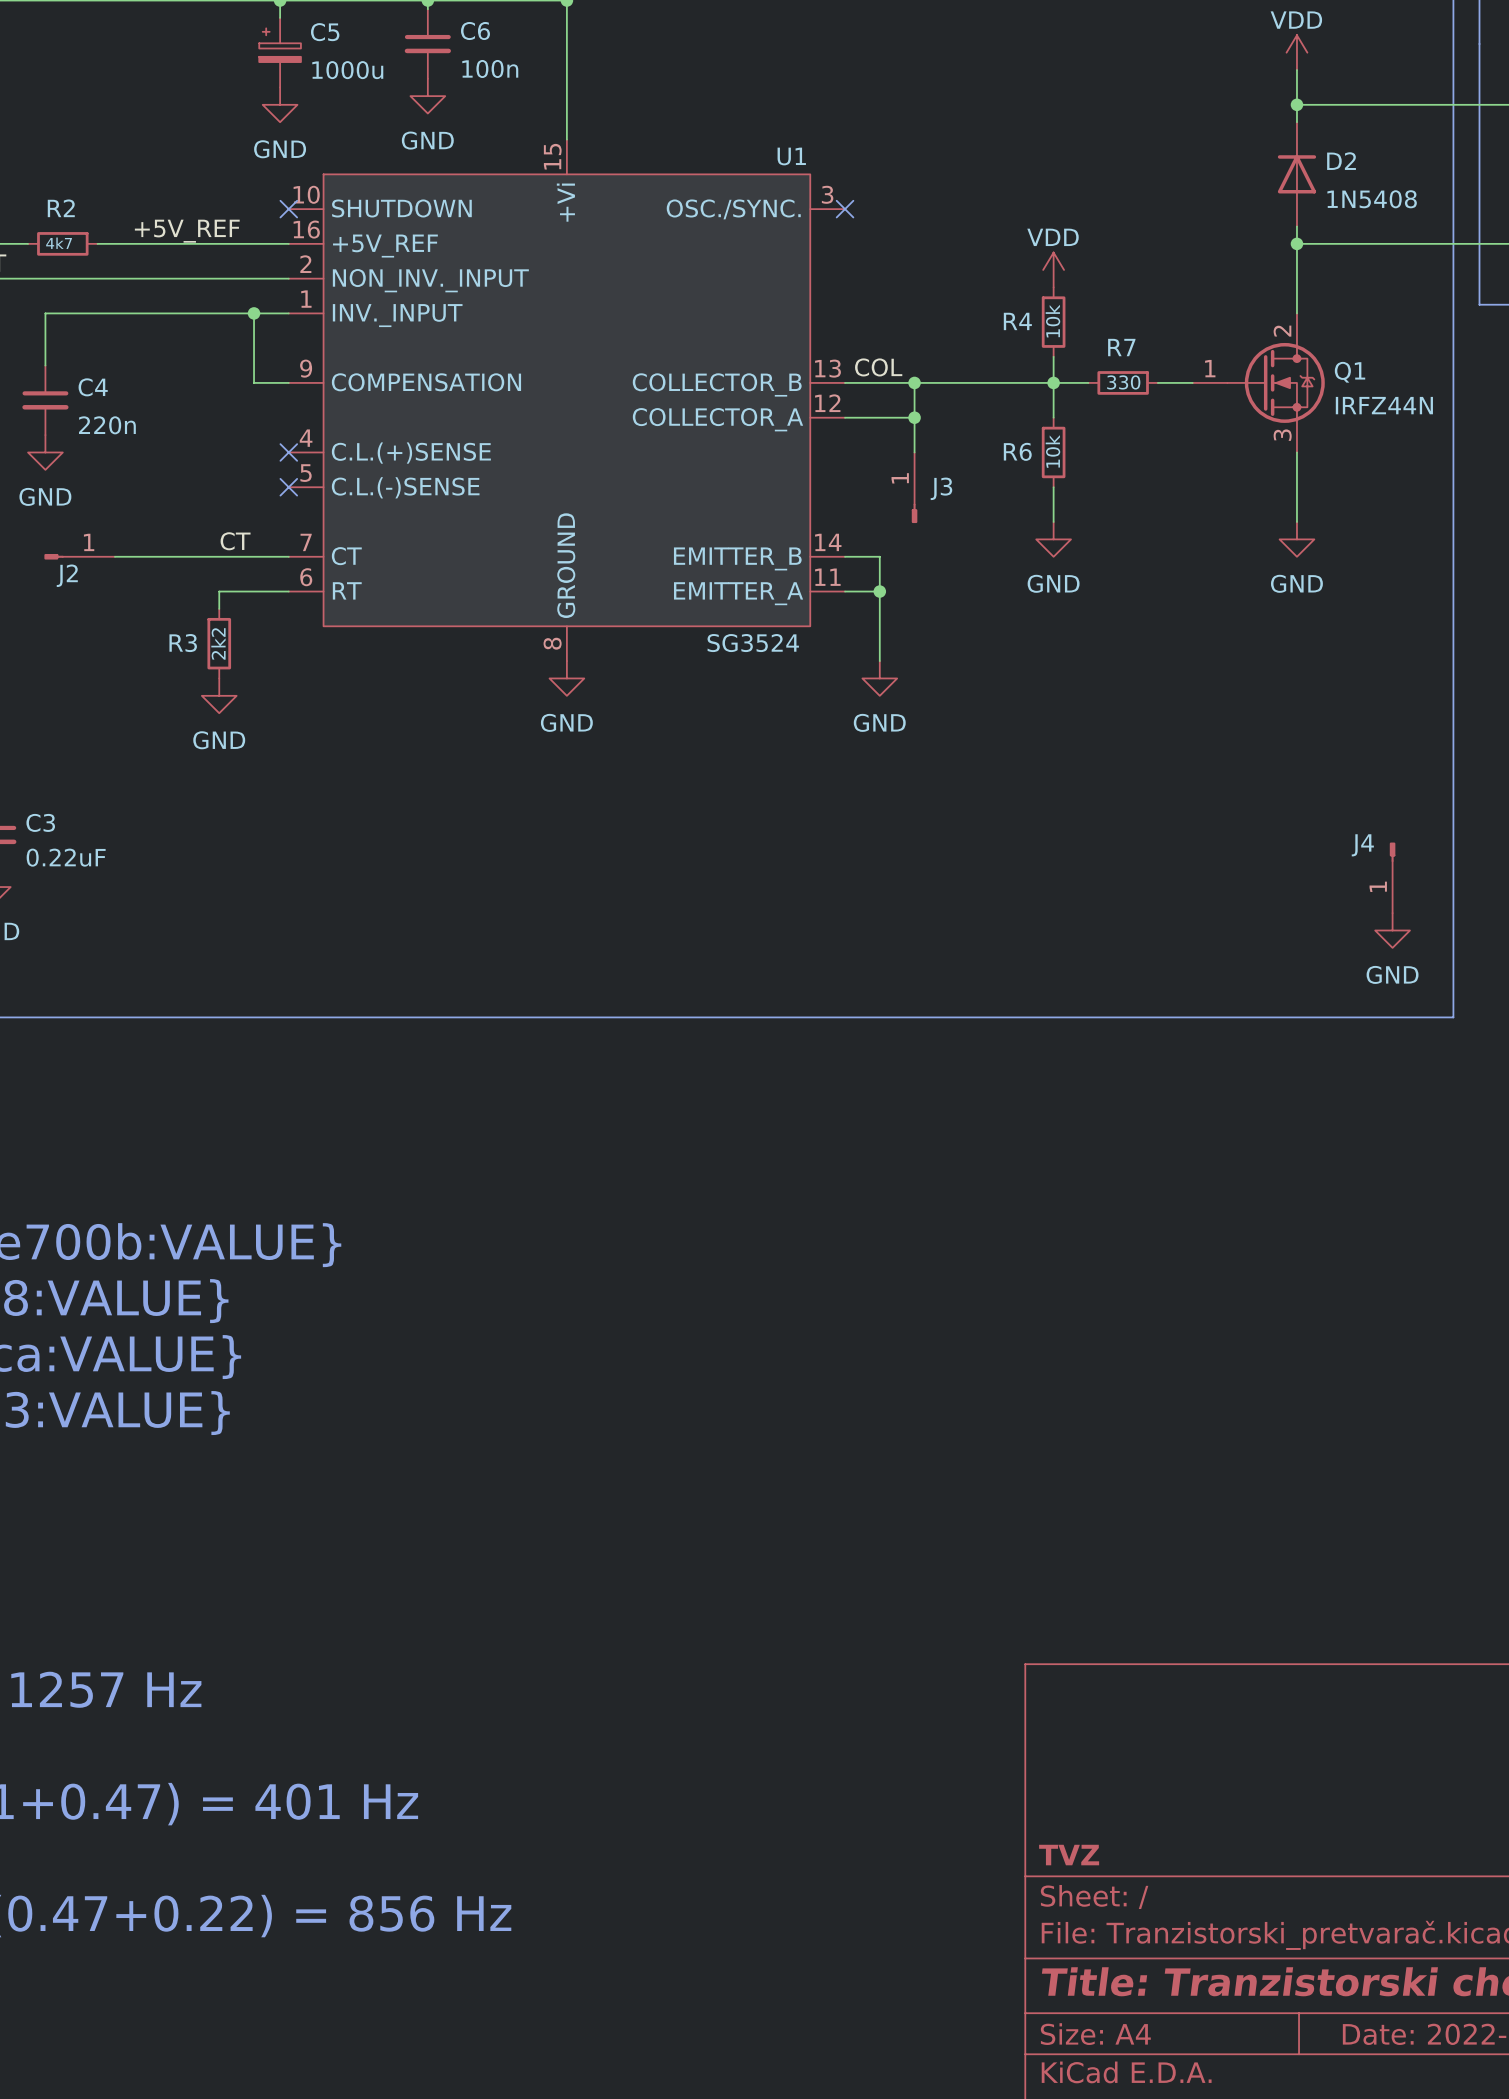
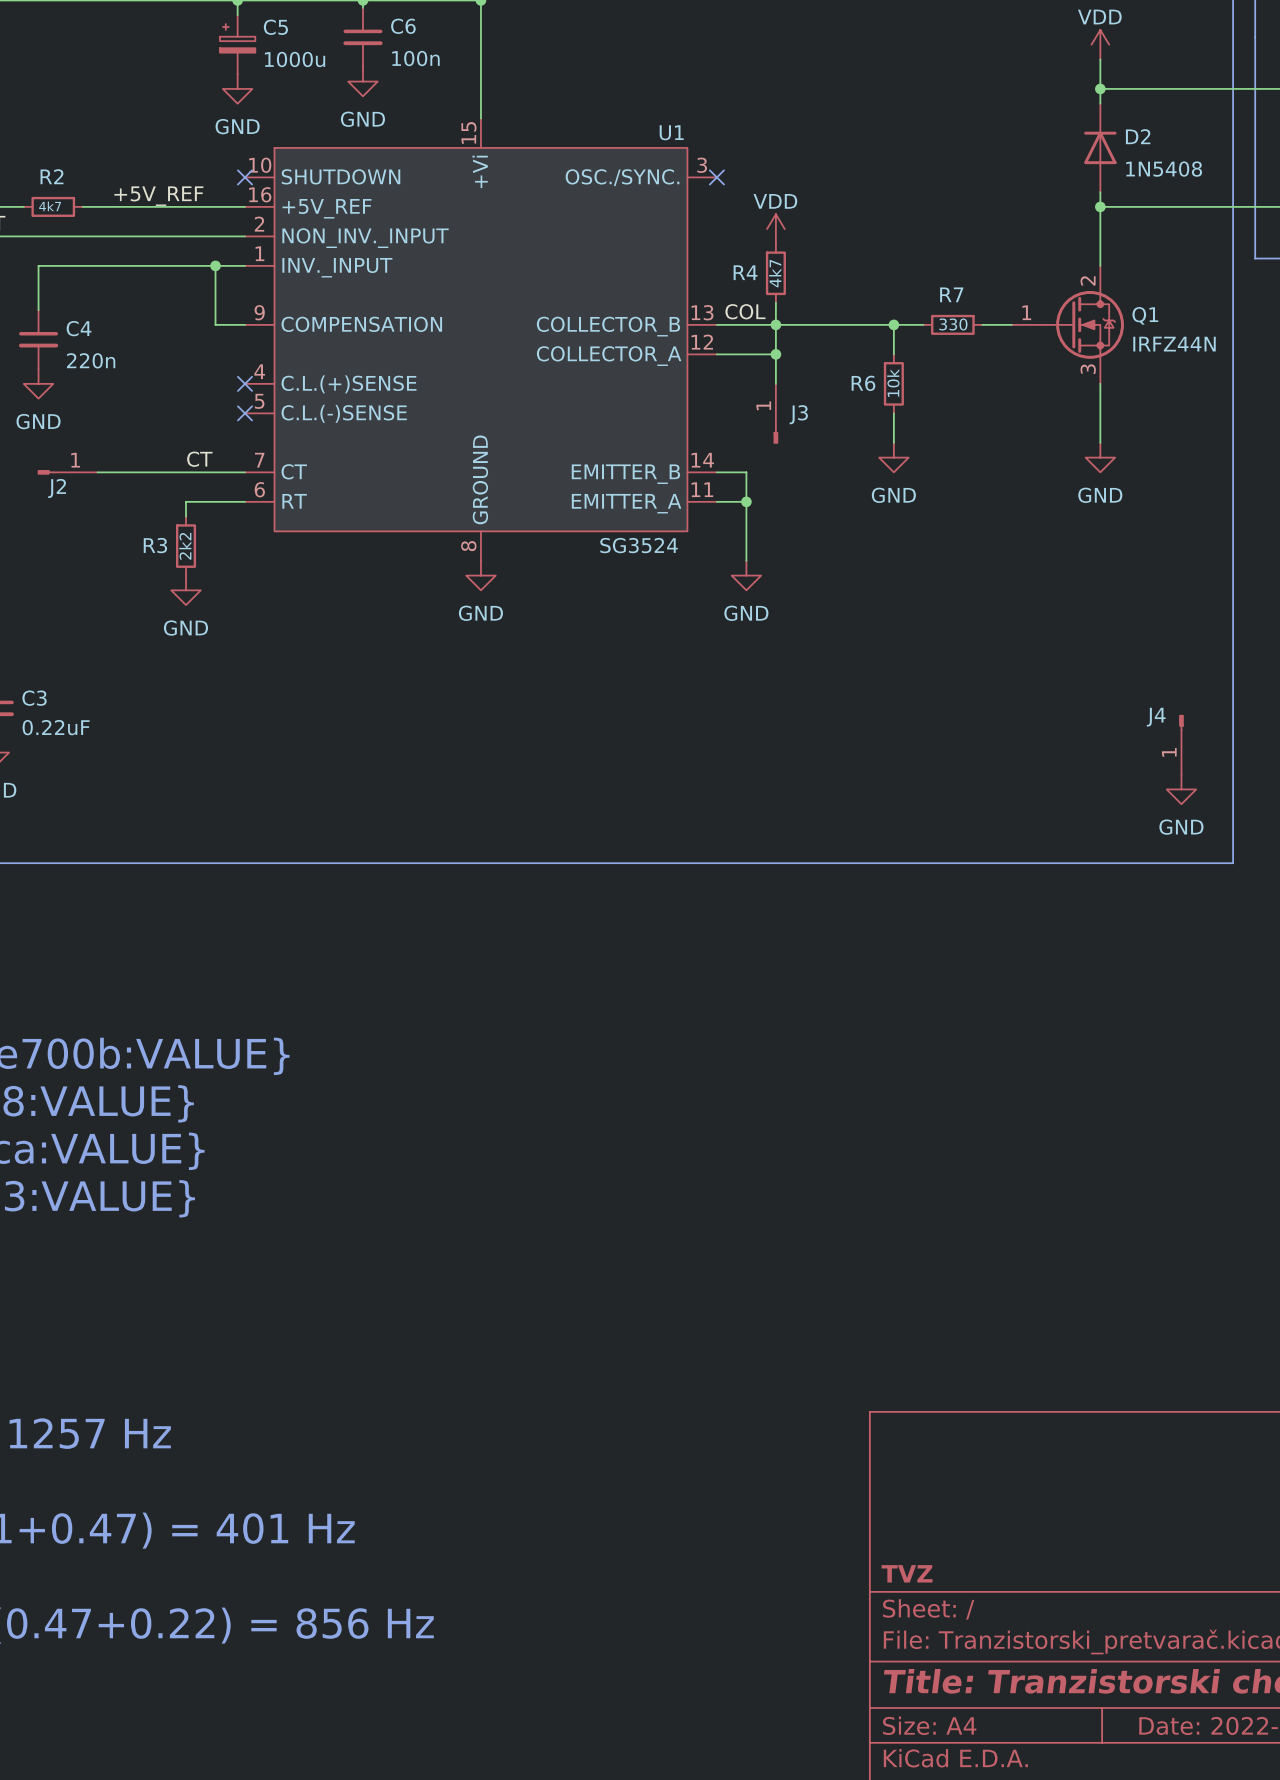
power symbol position: VDD (1053, 269) -> VDD (775, 229)
R4 value: 10k (1052, 321) -> 4k7 (775, 273)
R4 position: (1053, 322) -> (775, 273)
wire: (1053, 356) (1053, 382) -> (775, 302) (775, 324)

